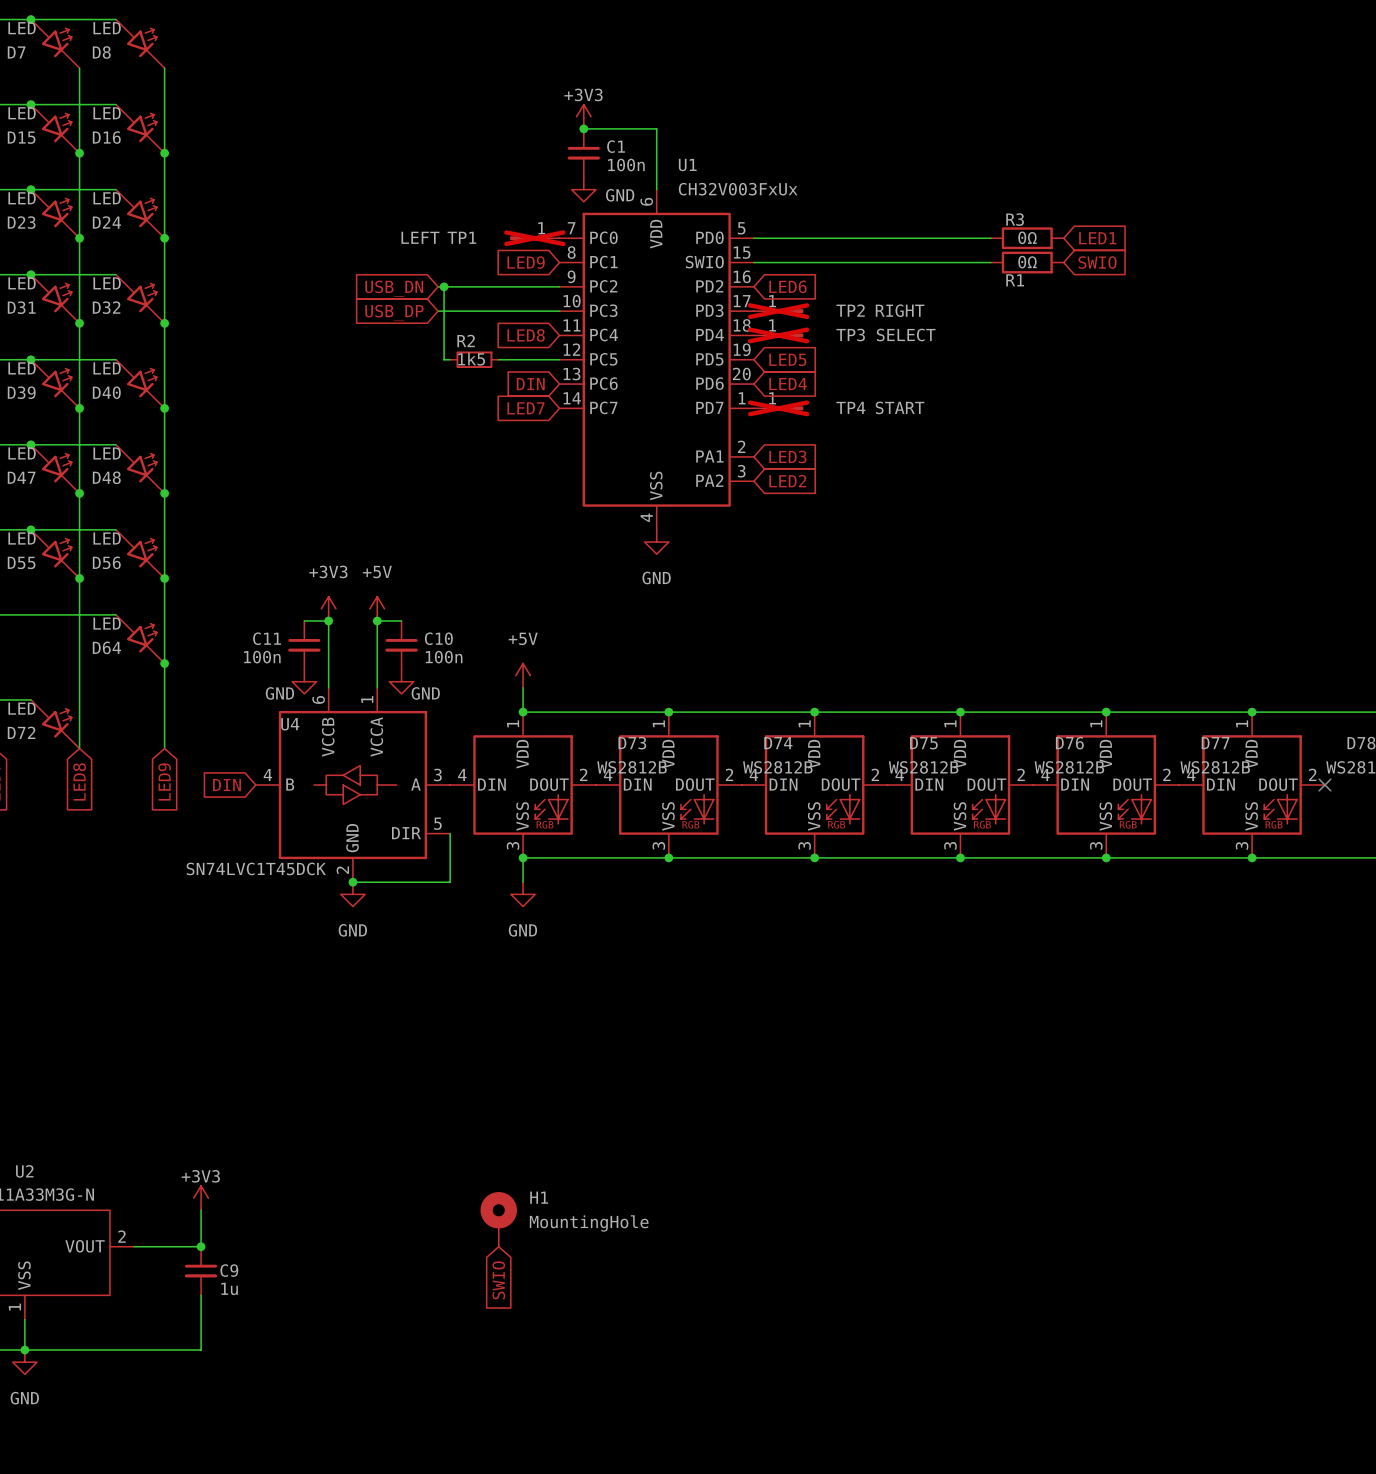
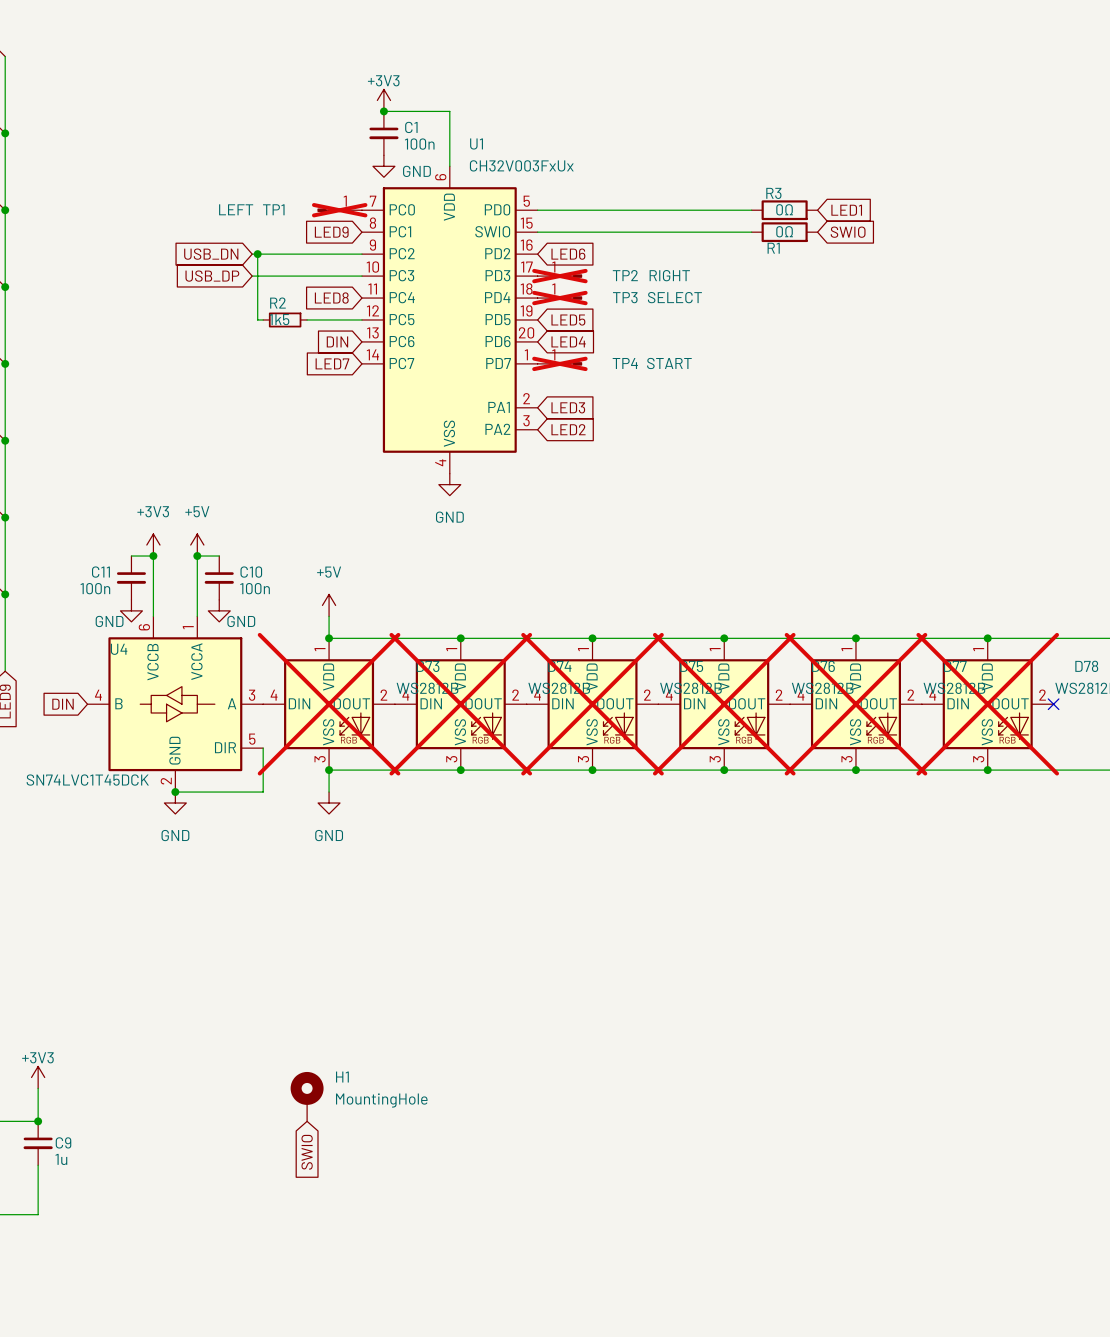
D73 do-not-place cross: none -> (329, 704)
D74 do-not-place cross: none -> (460, 704)
D75 do-not-place cross: none -> (592, 704)
D76 do-not-place cross: none -> (724, 704)
D77 do-not-place cross: none -> (855, 704)
D78 do-not-place cross: none -> (987, 704)

